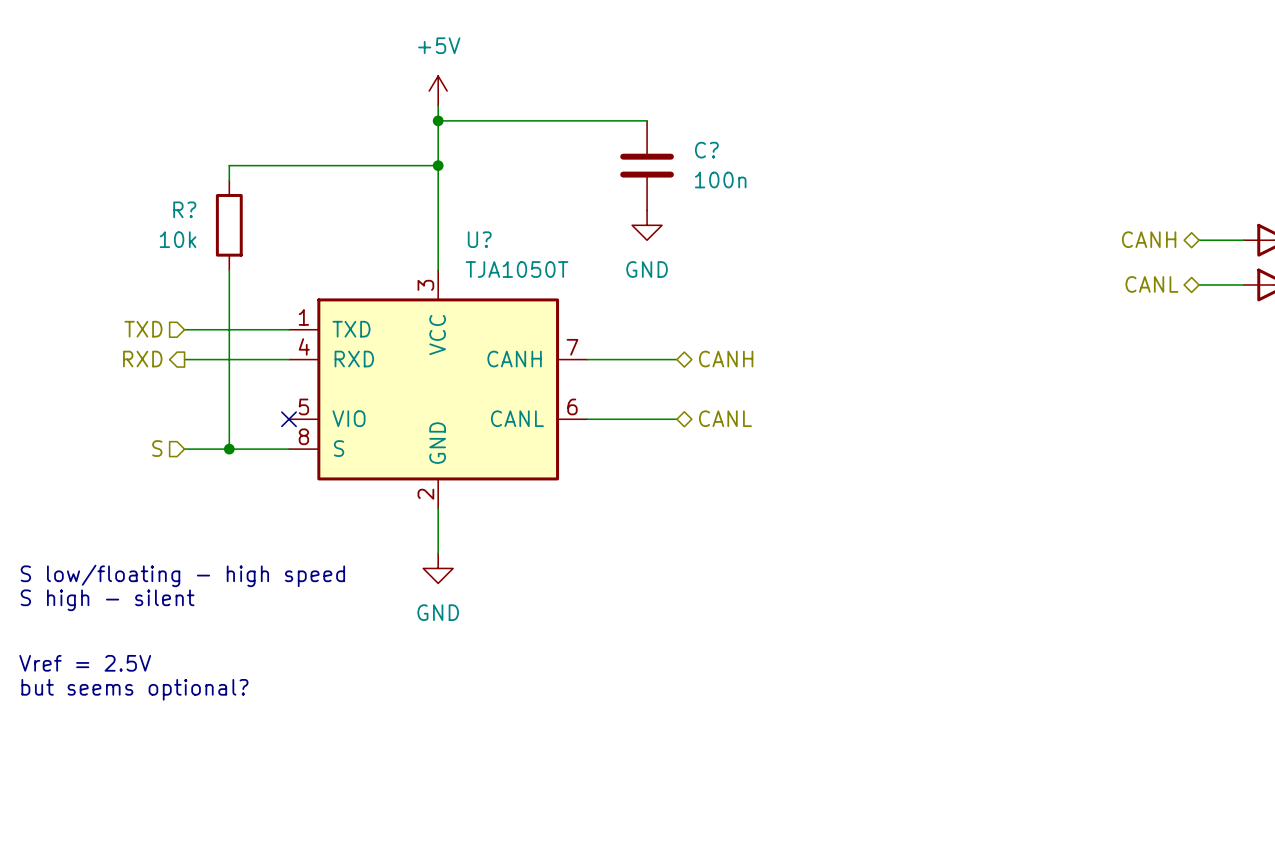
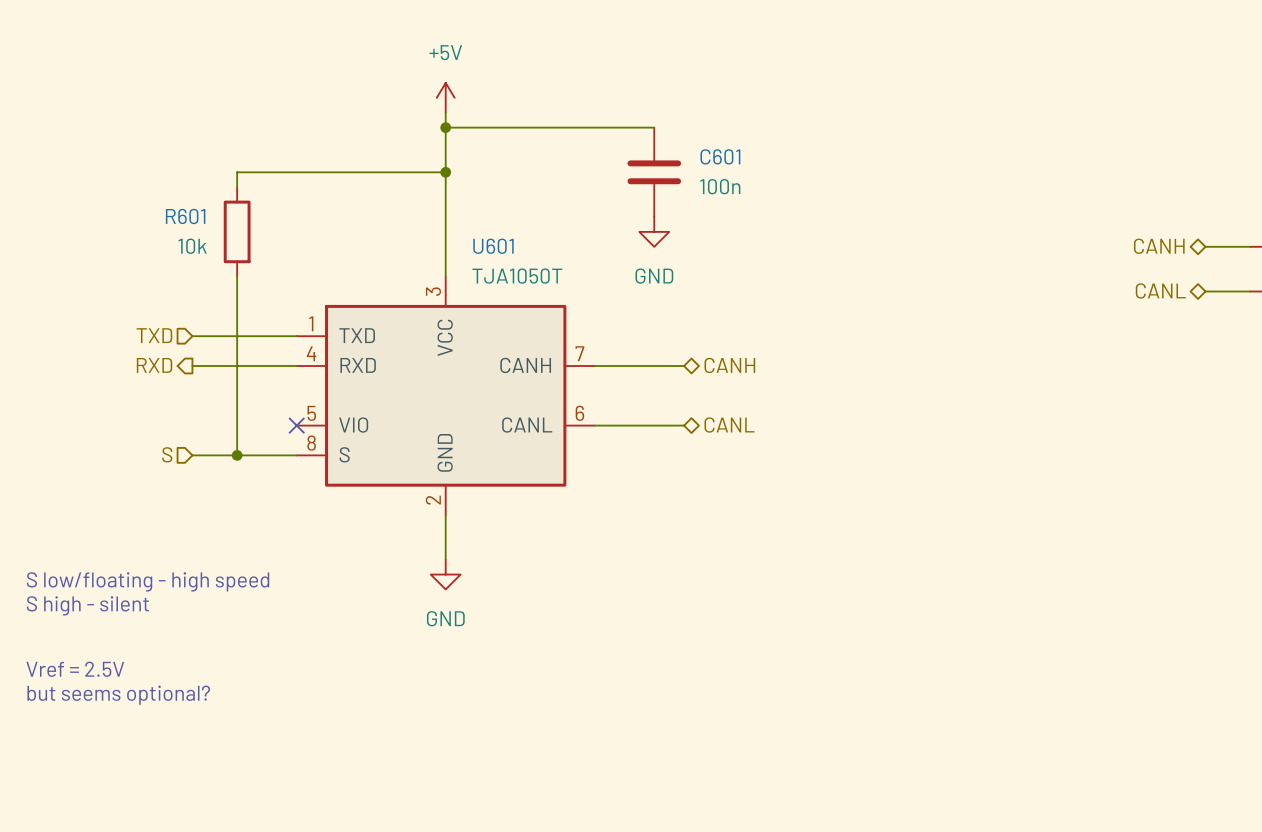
C? name: C? (706, 150) -> C601 (720, 156)
R? name: R? (184, 209) -> R601 (185, 216)
U? name: U? (479, 239) -> U601 (493, 246)

